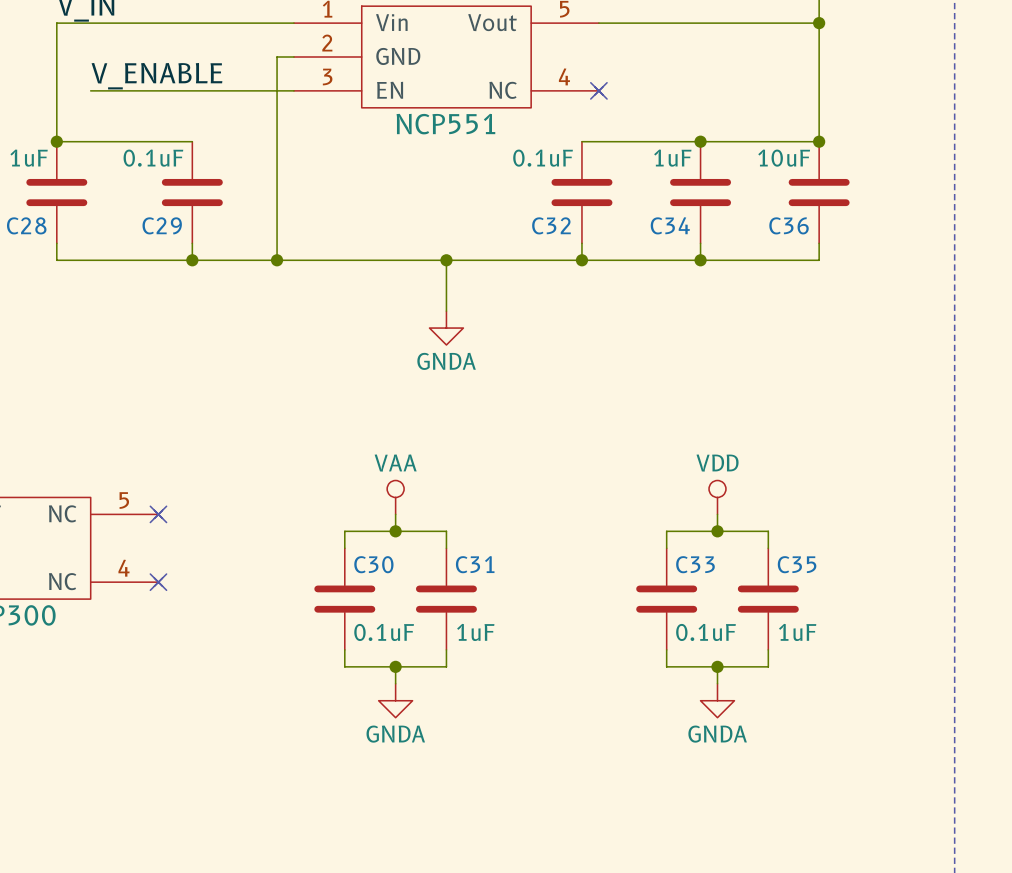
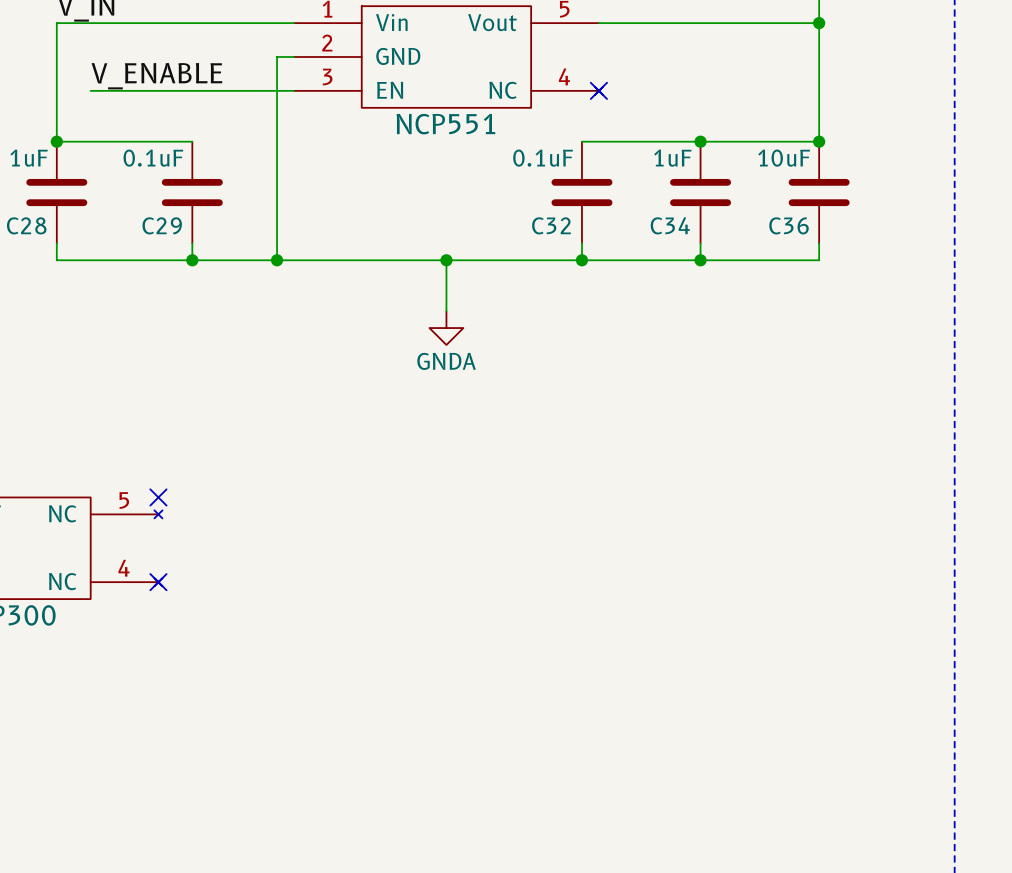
power symbol: VAA (395, 497) -> none
power symbol: VDD (717, 497) -> none
no-connect mark position: (158, 514) -> (158, 497)
wire: (395, 514) (395, 531) -> none
wire: (717, 514) (717, 531) -> none
junction: (395, 531) -> none
junction: (717, 531) -> none
wire: (344, 548) (344, 531) (446, 531) (446, 548) -> none
wire: (666, 548) (666, 531) (768, 531) (768, 548) -> none
C30: 0.1uF (344, 599) -> none
C31: 1uF (446, 599) -> none
C33: 0.1uF (666, 599) -> none
C35: 1uF (768, 599) -> none
wire: (344, 649) (344, 666) (446, 666) (446, 649) -> none
wire: (666, 649) (666, 666) (768, 666) (768, 649) -> none
wire: (395, 666) (395, 683) -> none
junction: (395, 666) -> none
wire: (717, 666) (717, 683) -> none
junction: (717, 666) -> none
power symbol: GNDA (395, 700) -> none
power symbol: GNDA (717, 700) -> none

